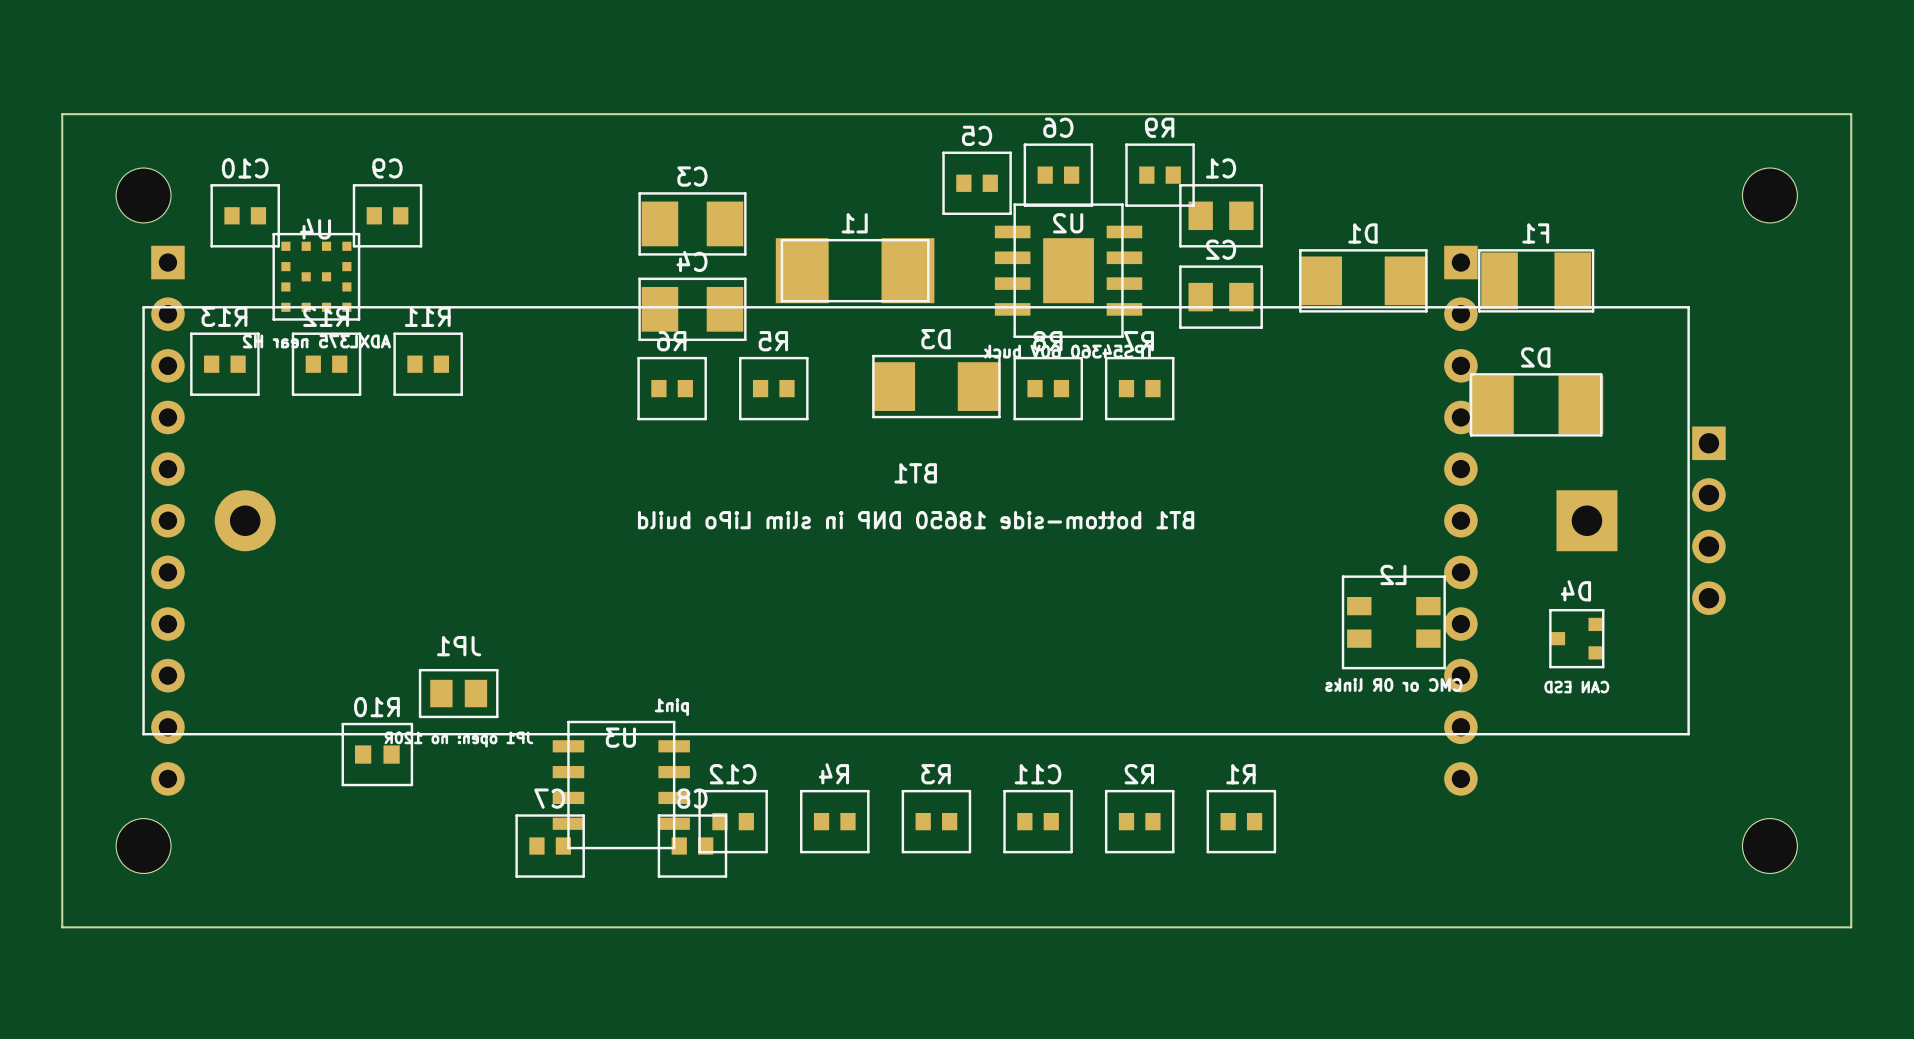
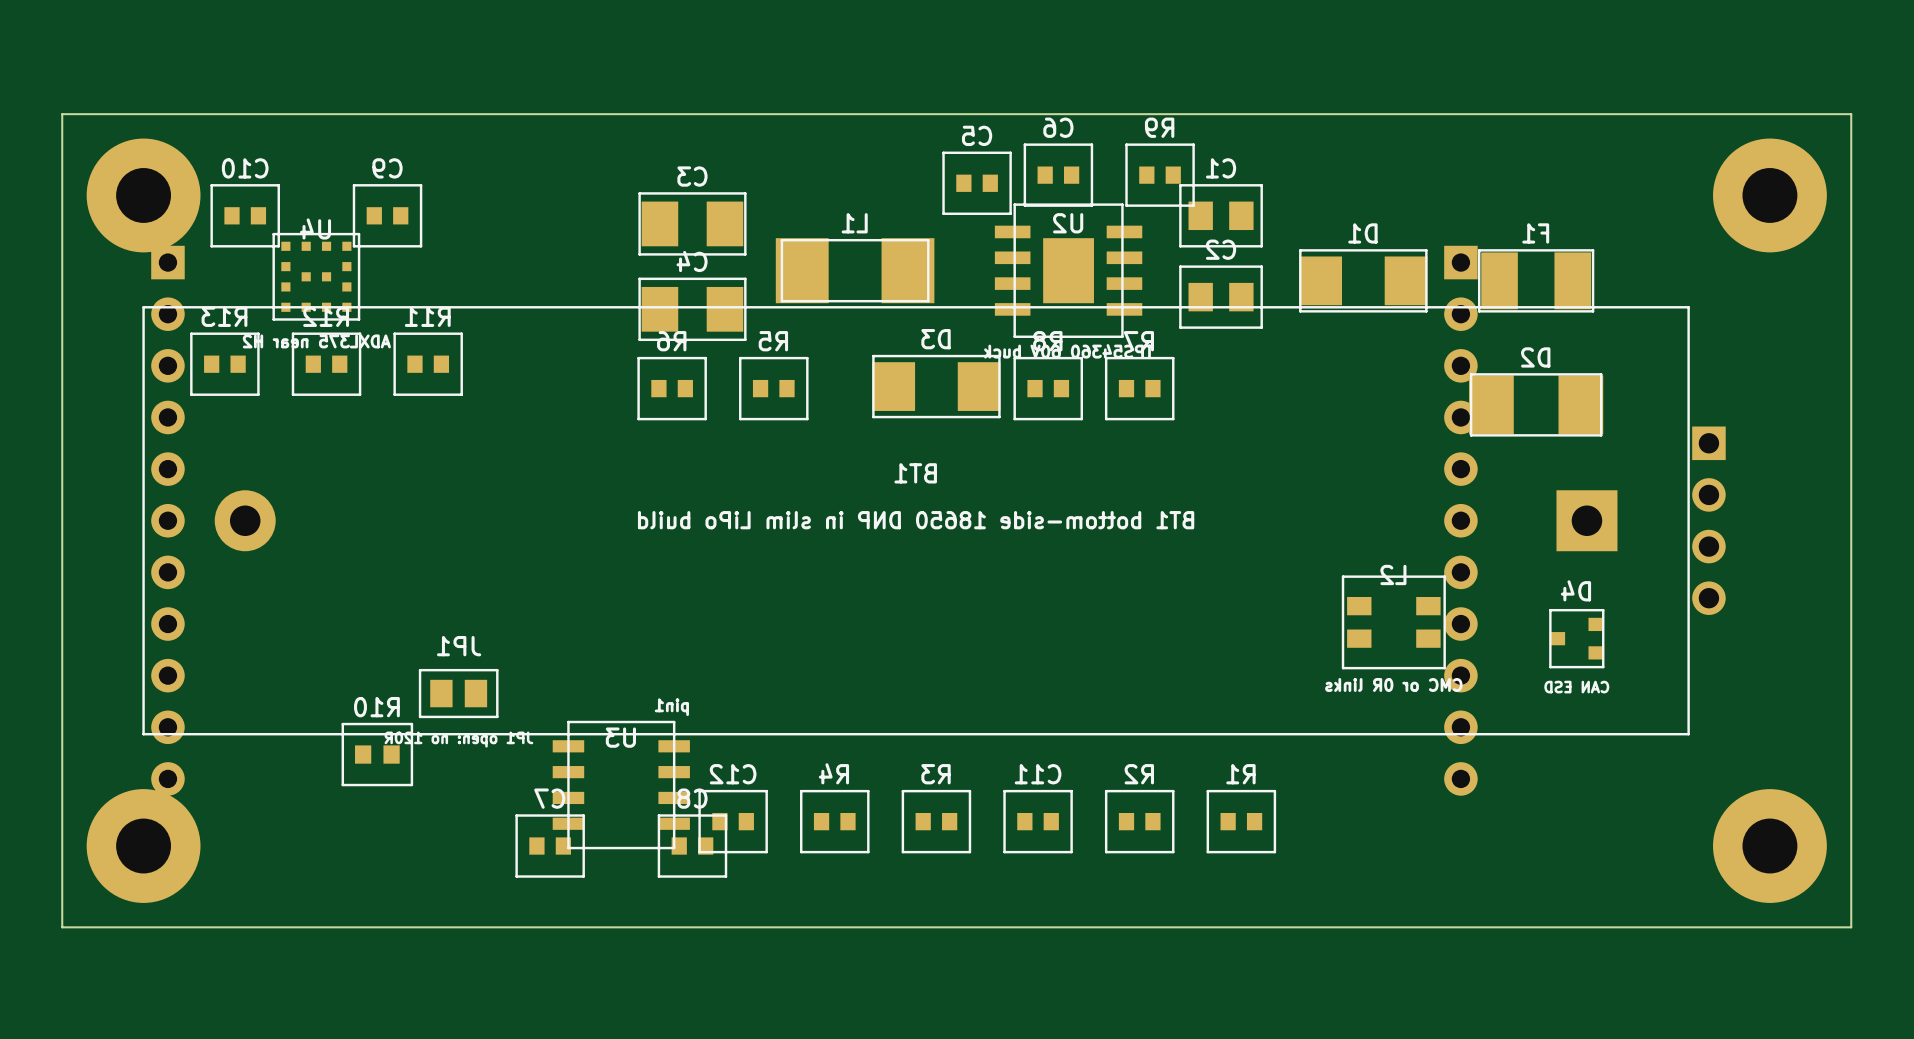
part footprint: [116, 168, 172, 223] -> [86, 138, 201, 253]
part footprint: [1742, 168, 1798, 223] -> [1713, 138, 1827, 253]
part footprint: [116, 818, 172, 874] -> [86, 789, 201, 903]
part footprint: [1742, 818, 1798, 874] -> [1713, 789, 1827, 903]

